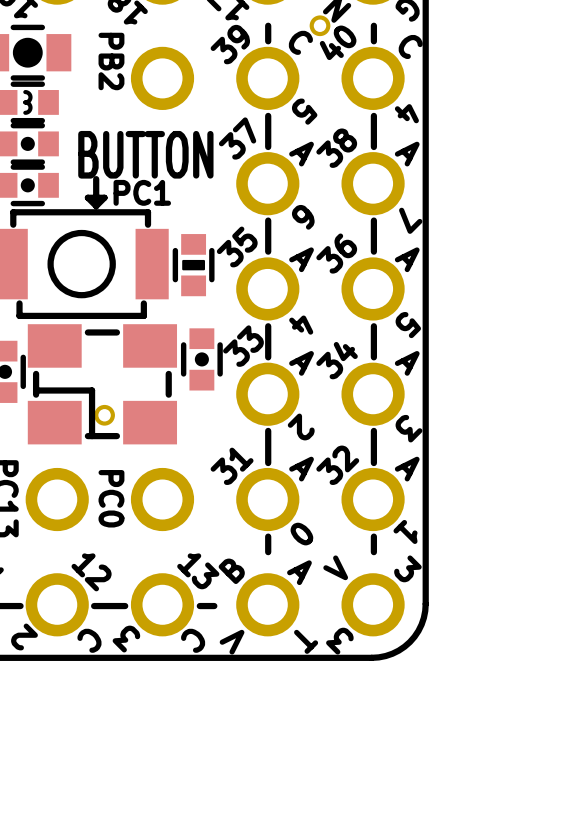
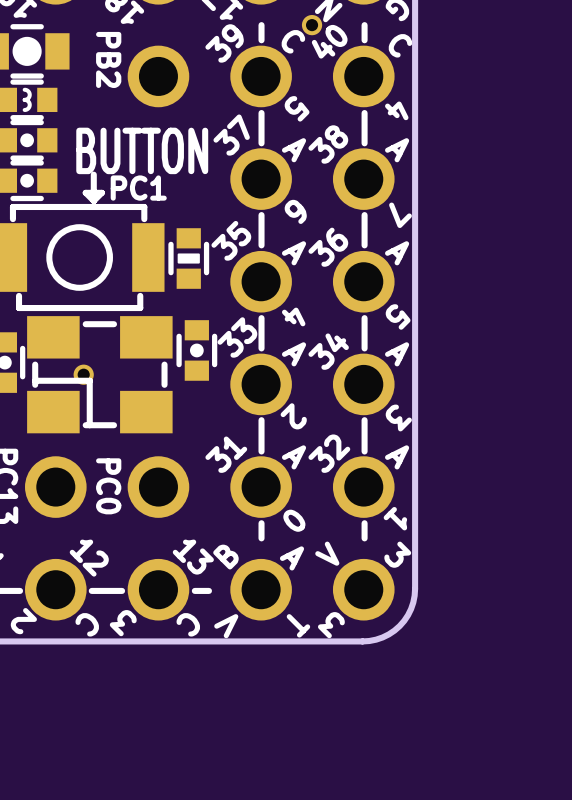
part position: (104, 415) -> (83, 374)

